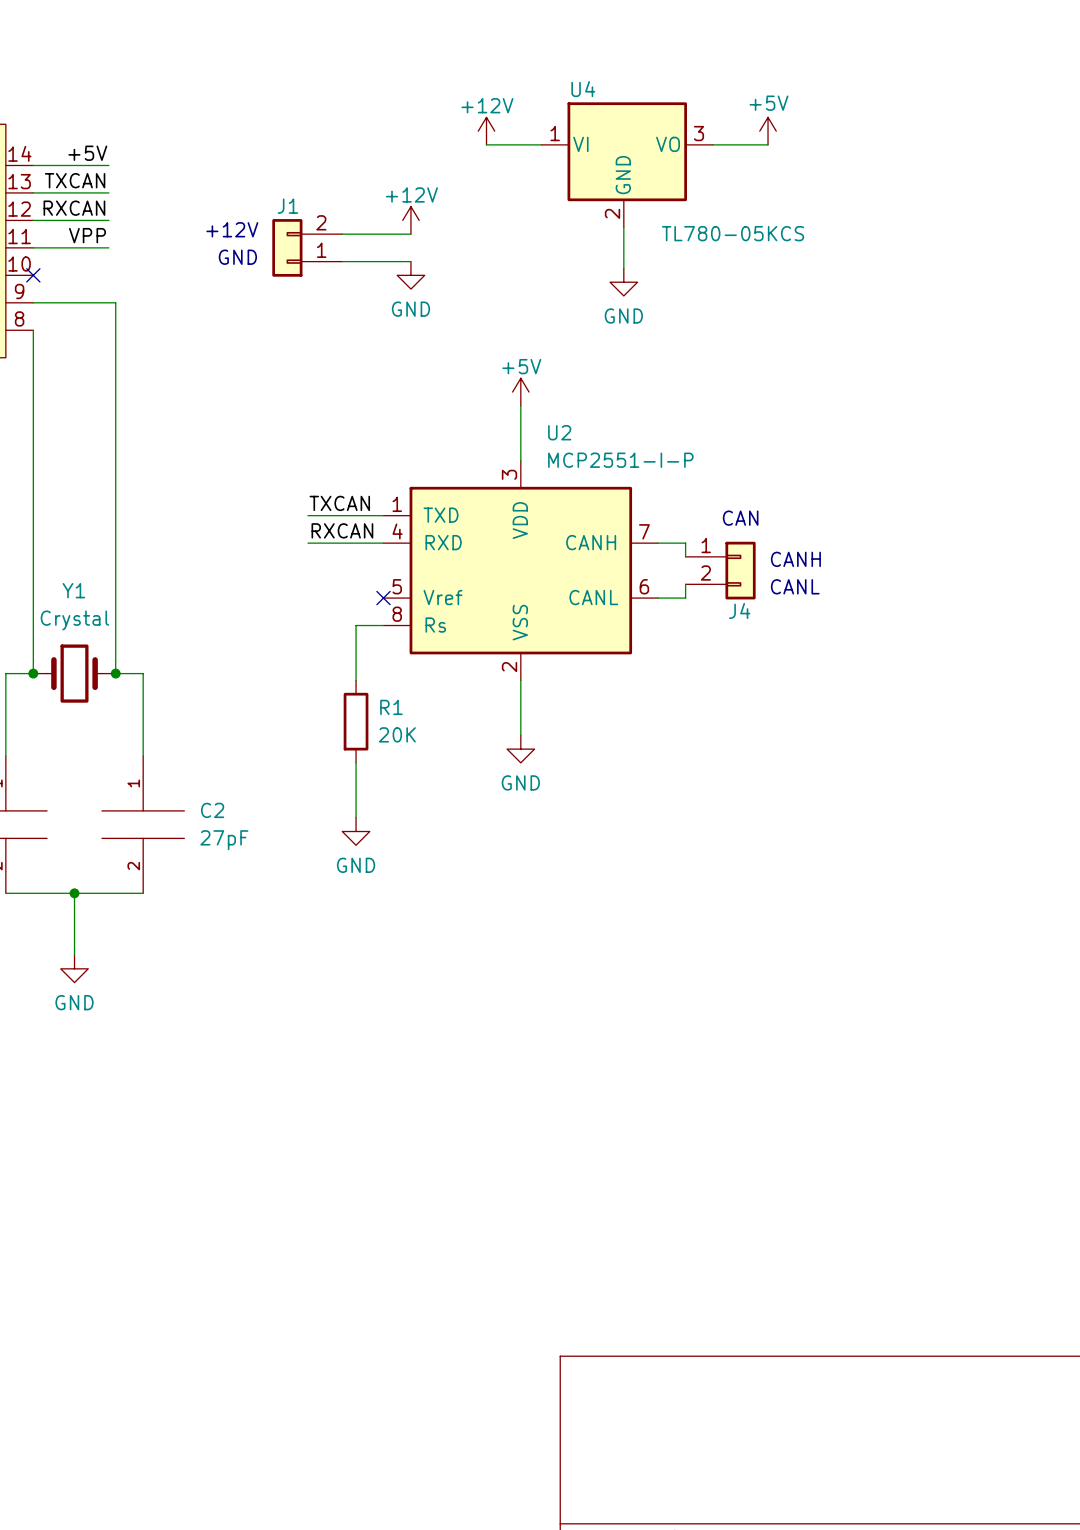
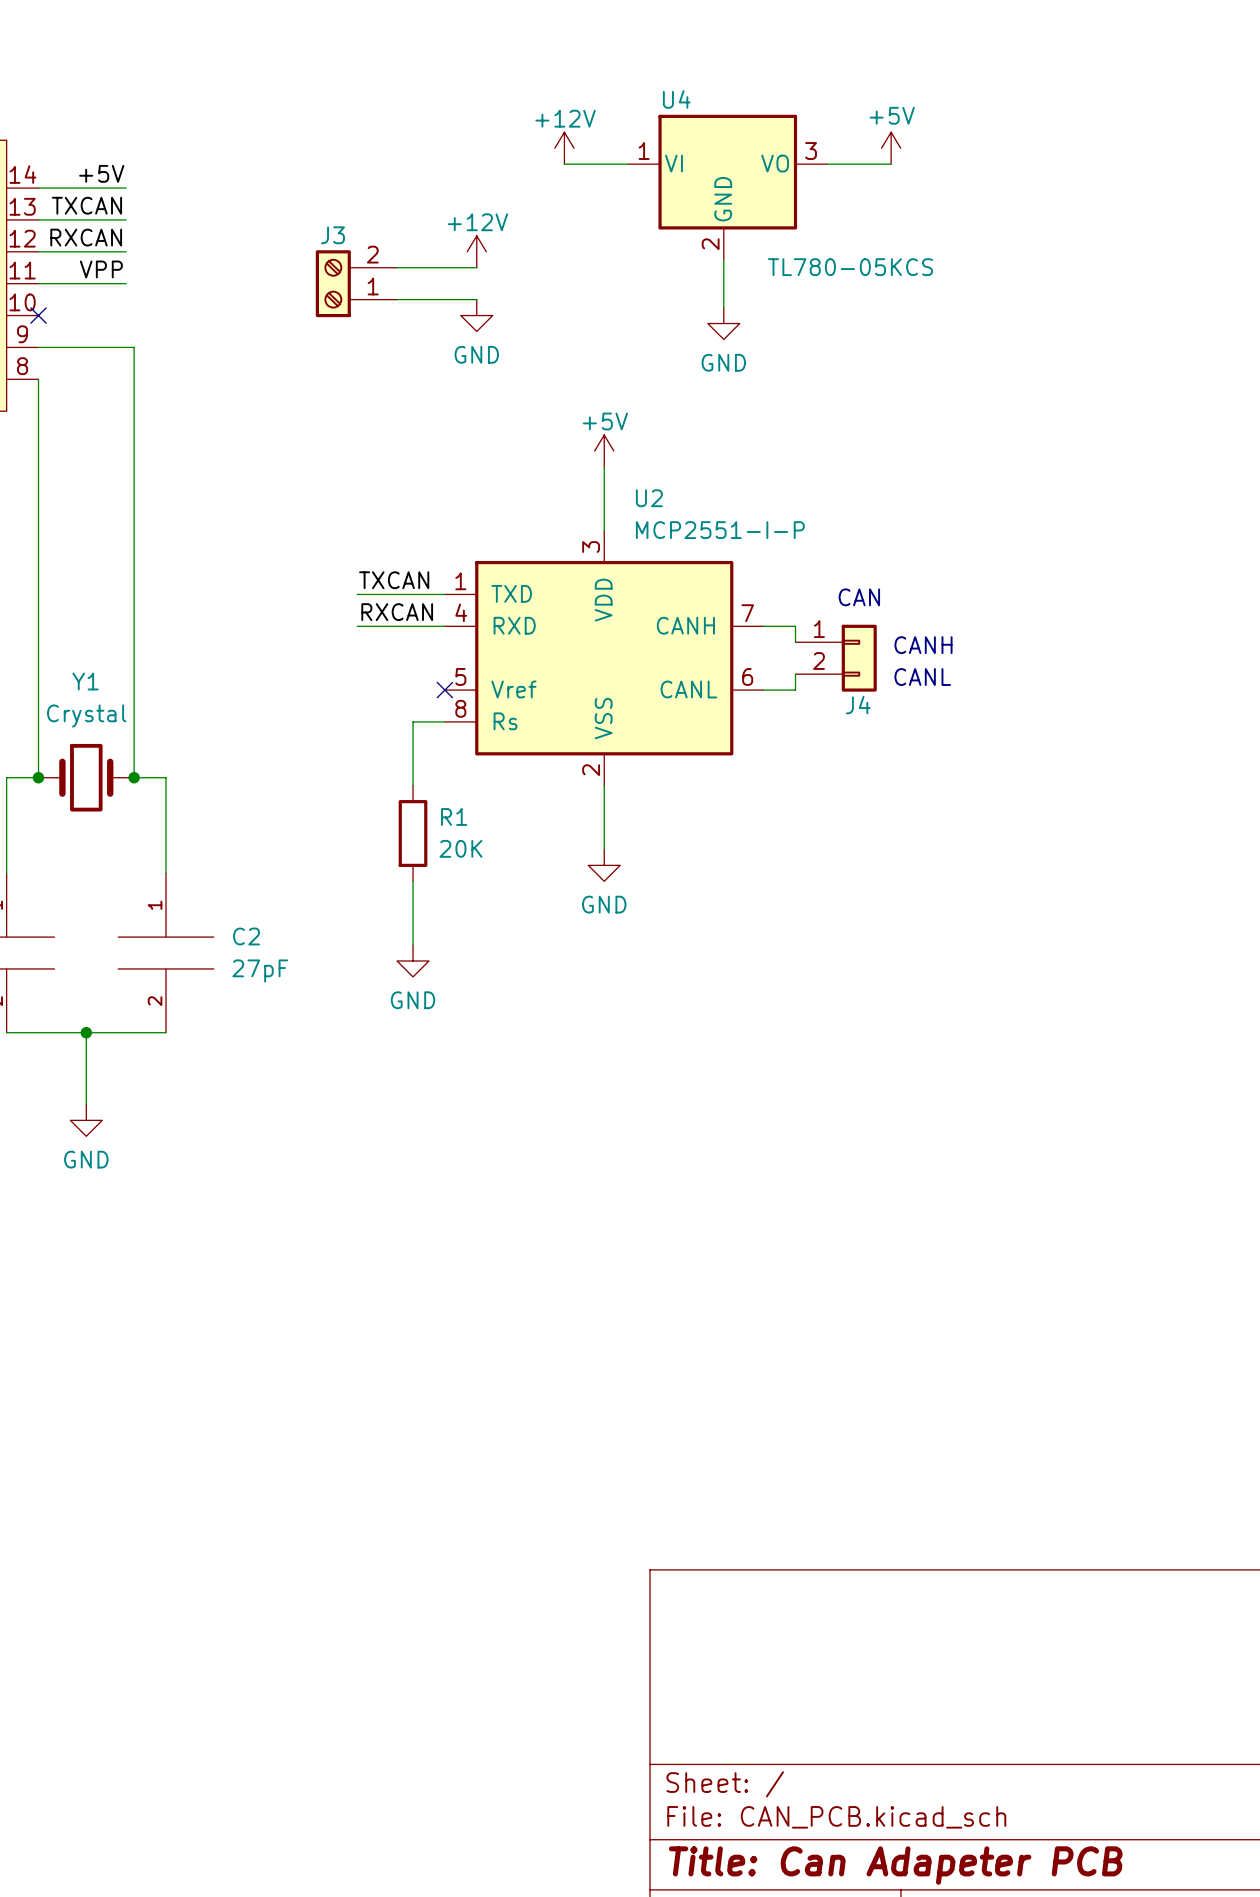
text: +12V (232, 229) -> none
J1: (307, 247) -> none
J3: none -> (356, 283)
text: GND (237, 257) -> none

